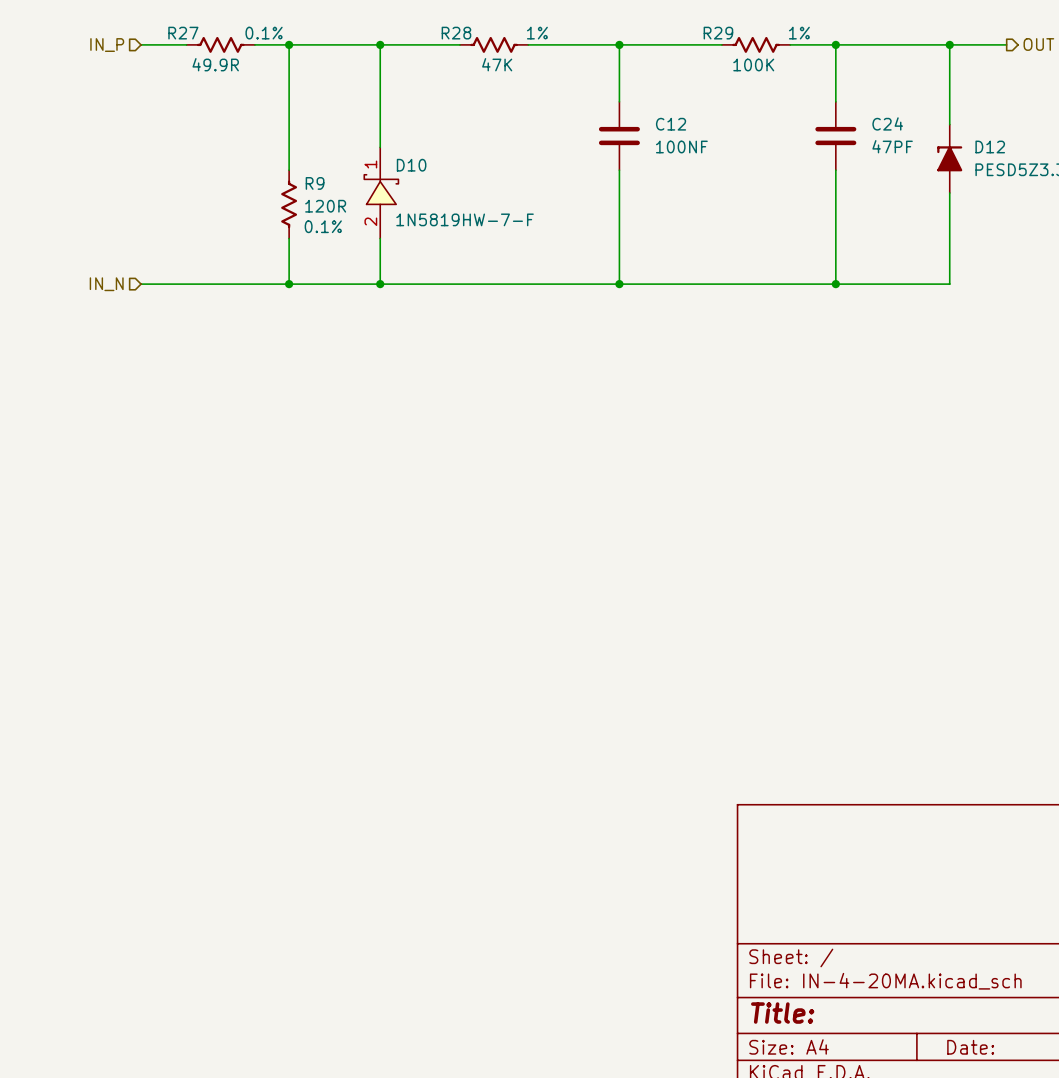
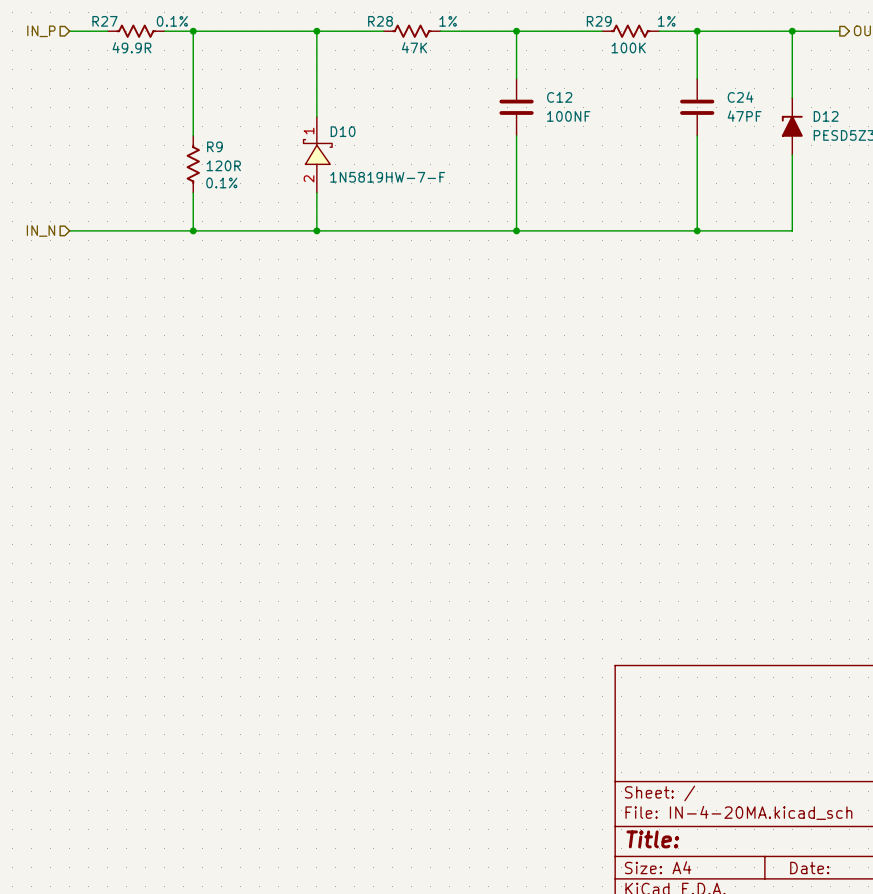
wire: (141, 44) (186, 44) -> (69, 31) (107, 31)
R27 position: (220, 44) -> (136, 31)
junction: none -> (193, 31)
wire: (289, 44) (289, 170) -> (193, 31) (193, 135)
junction: (289, 44) -> none
hierarchical label position: IN_P (107, 45) -> IN_P (41, 31)
R9 position: (289, 204) -> (193, 164)
wire: (289, 238) (289, 284) -> (193, 192) (193, 230)
wire: none -> (69, 230) (117, 230)
hierarchical label position: IN_N (106, 284) -> IN_N (40, 230)
junction: none -> (193, 230)
junction: (289, 284) -> none

